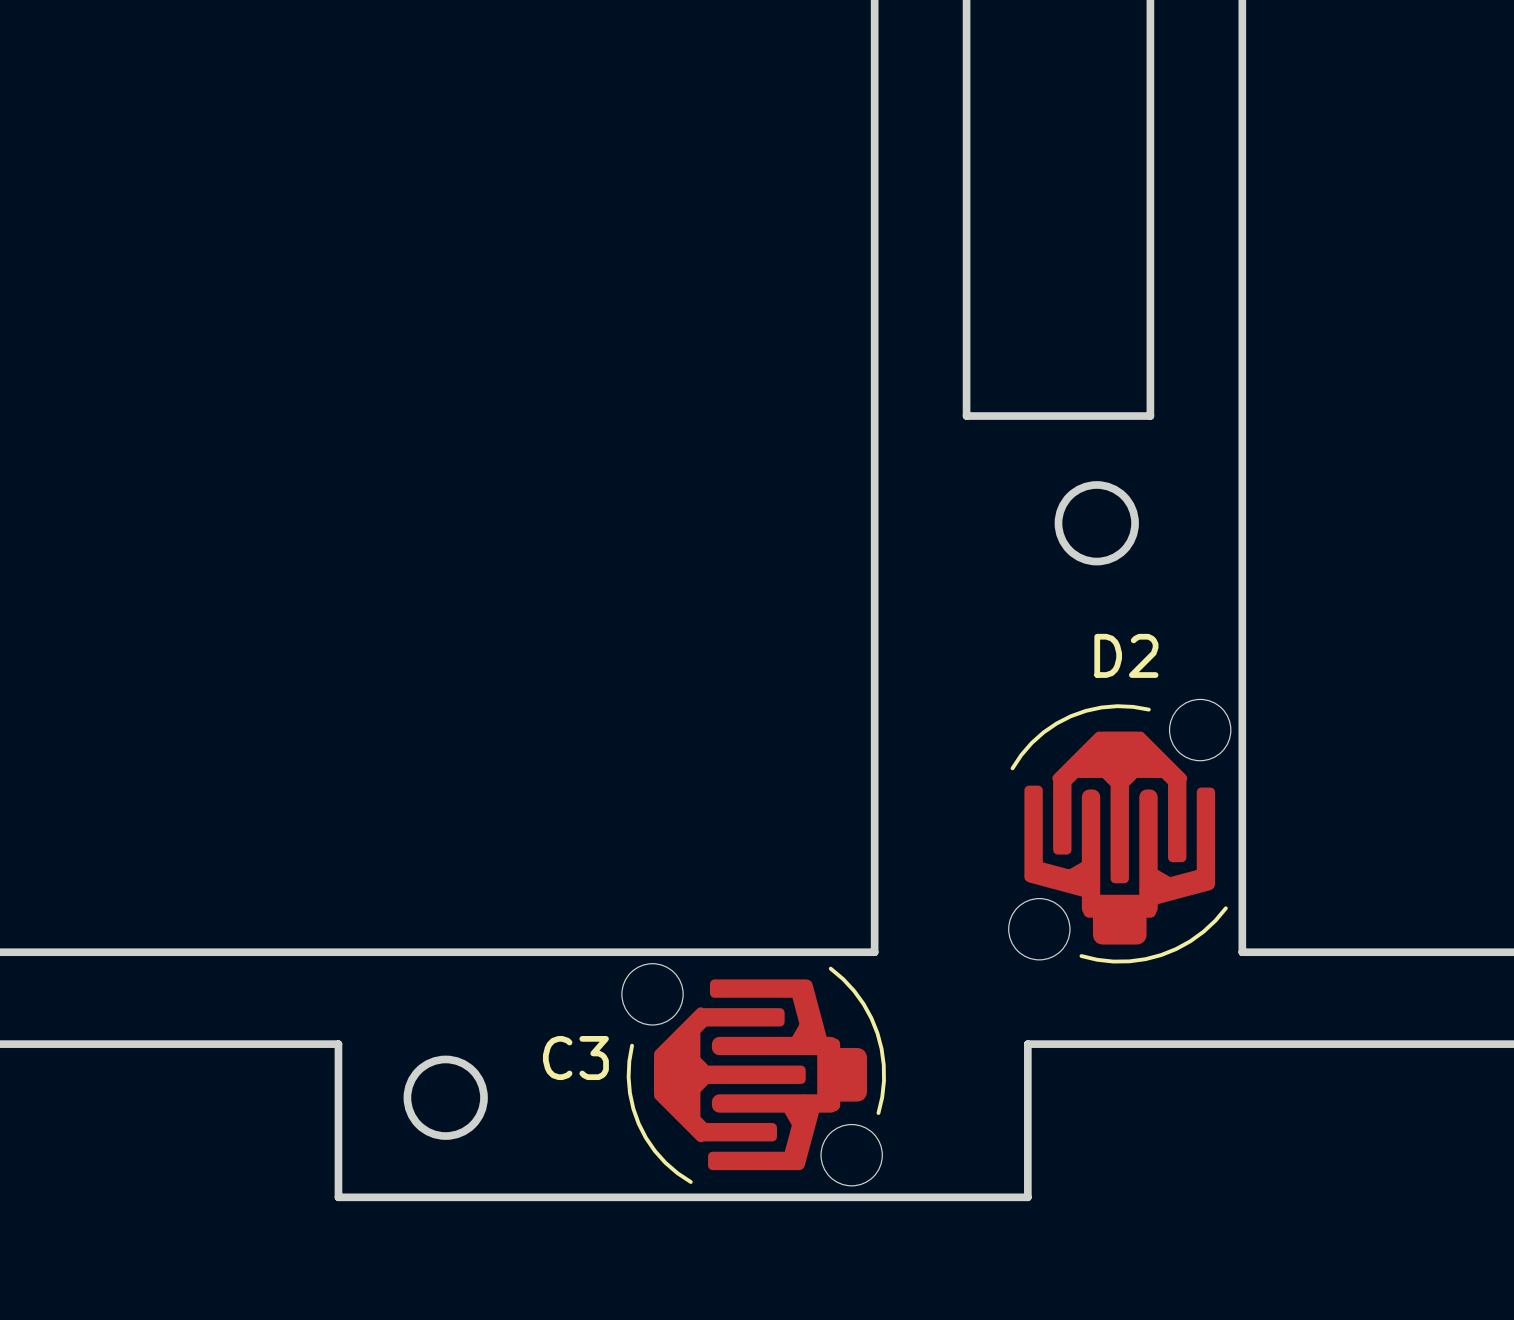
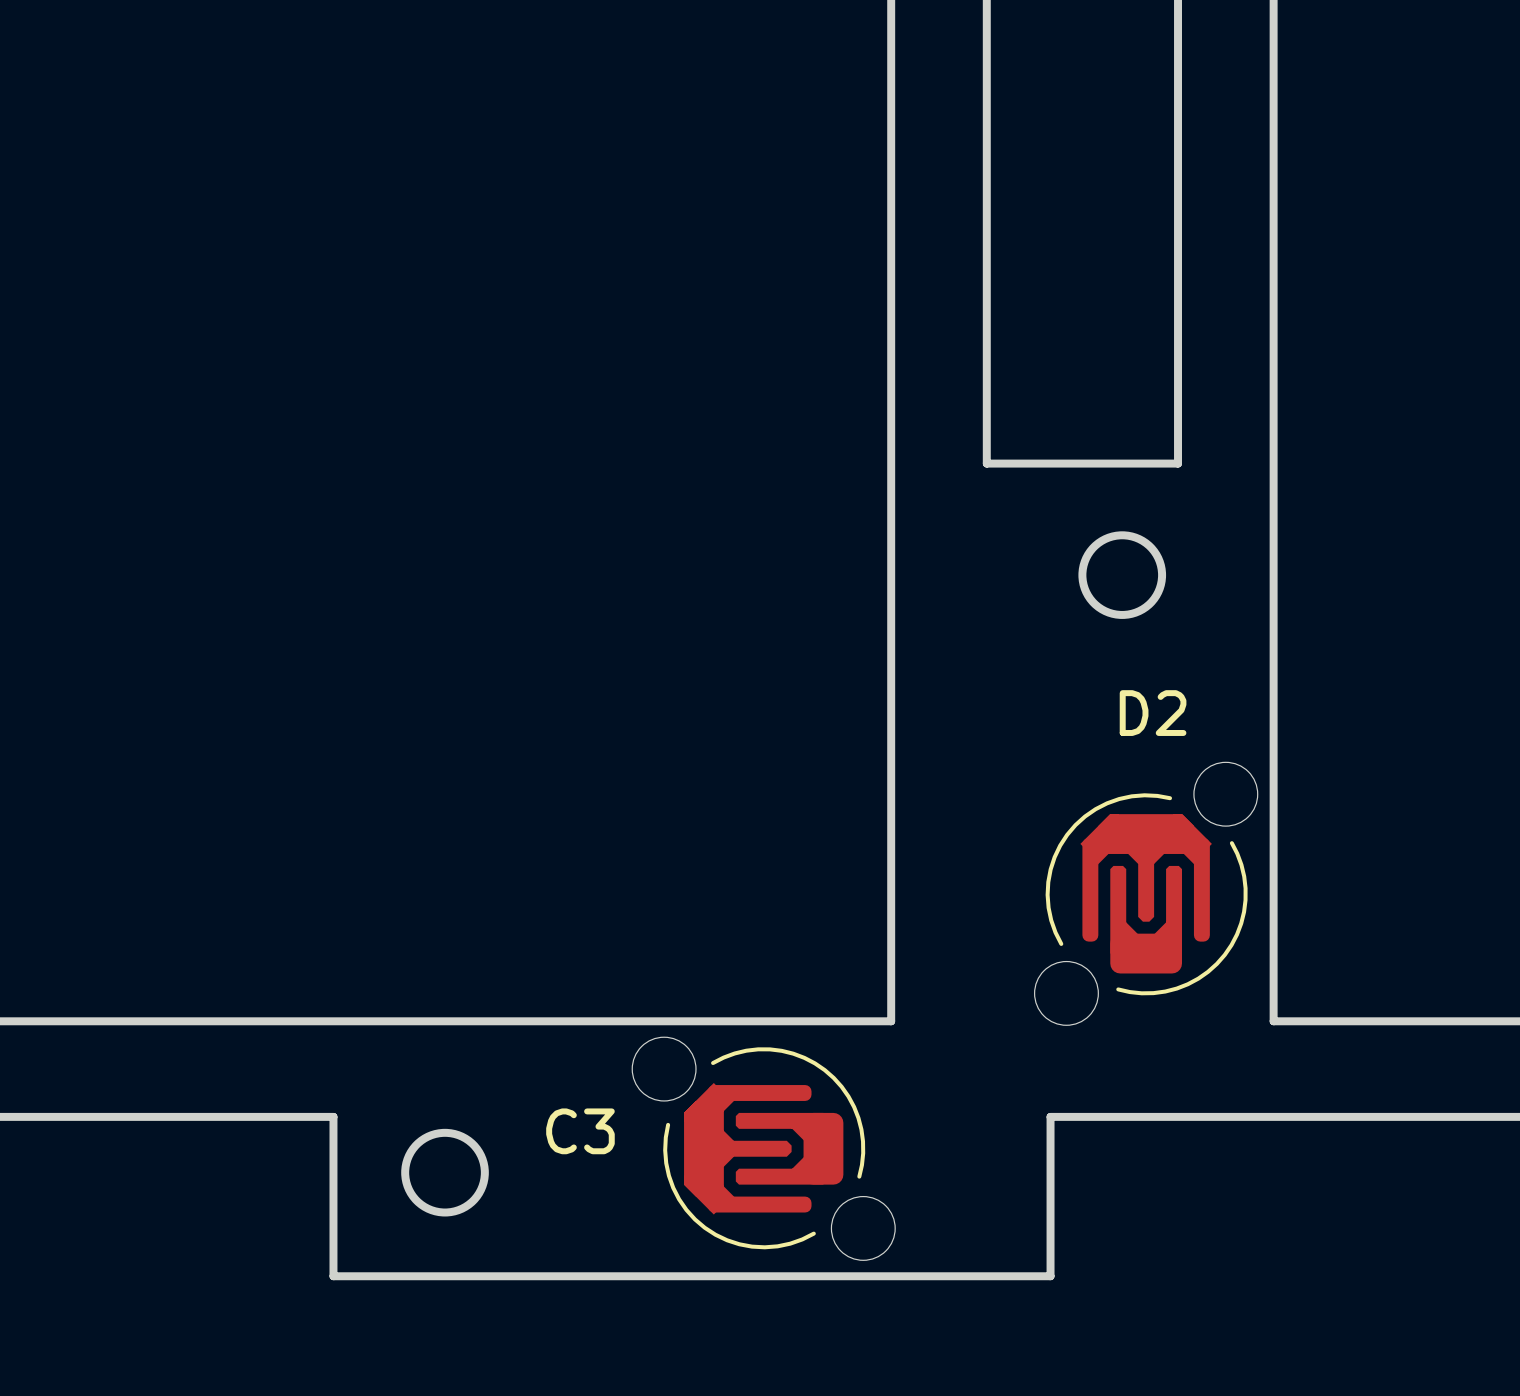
D2 footprint: [1008, 699, 1231, 964] -> [1034, 762, 1258, 1026]
C3 footprint: [621, 963, 886, 1186] -> [632, 1037, 896, 1261]

